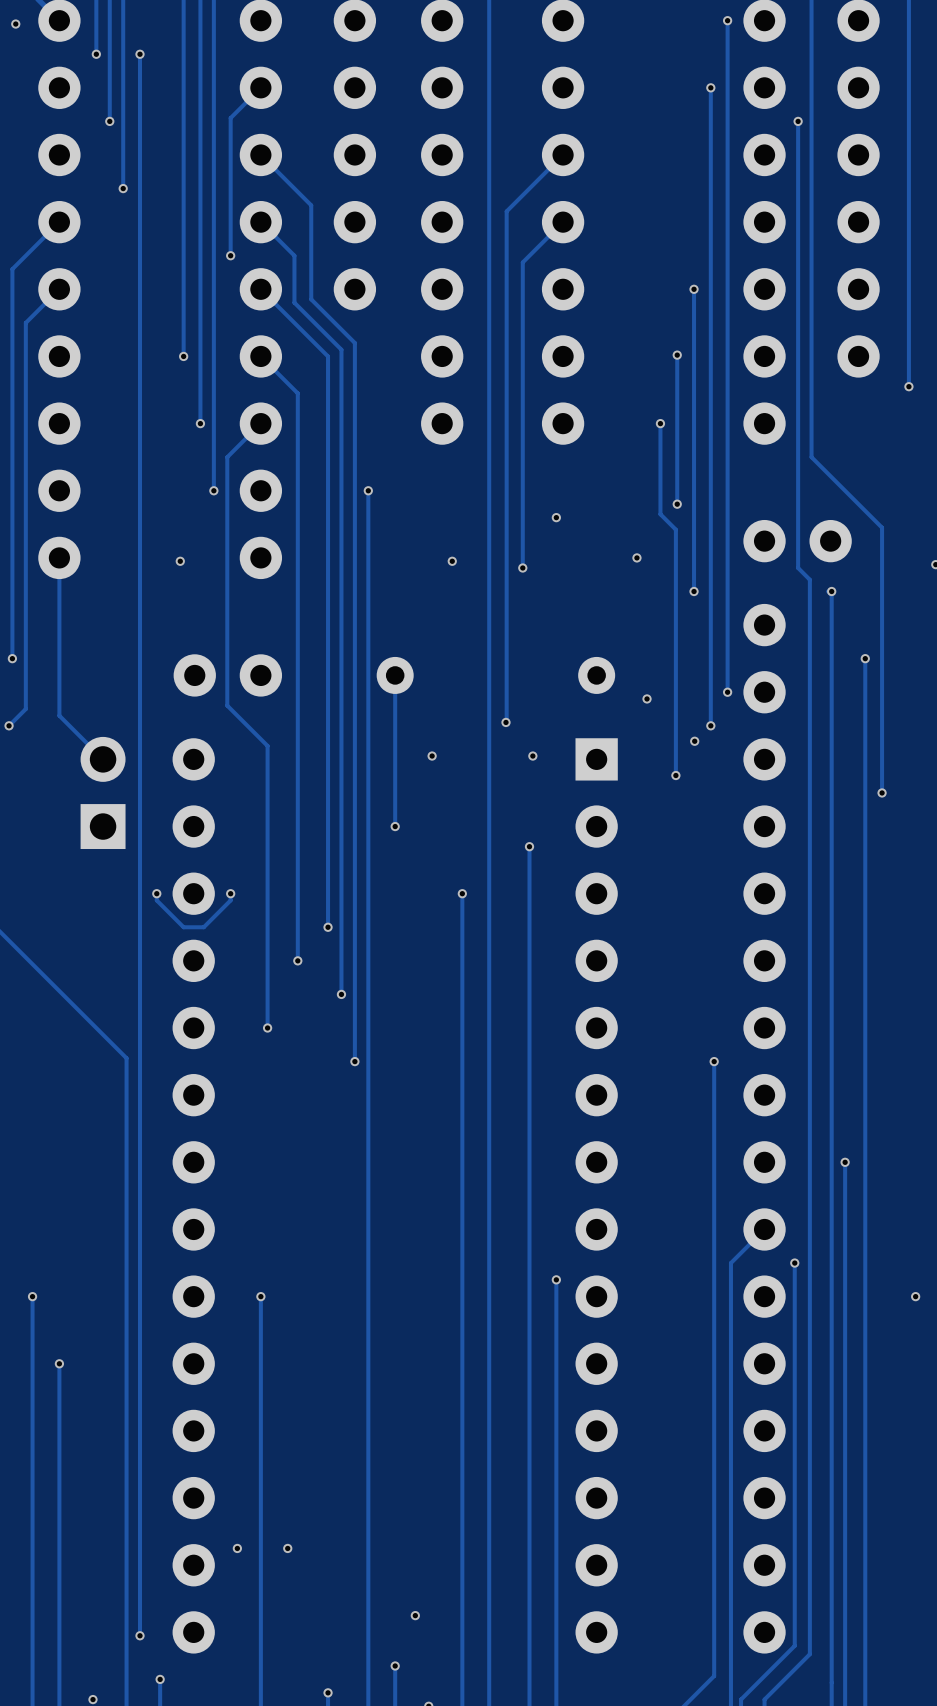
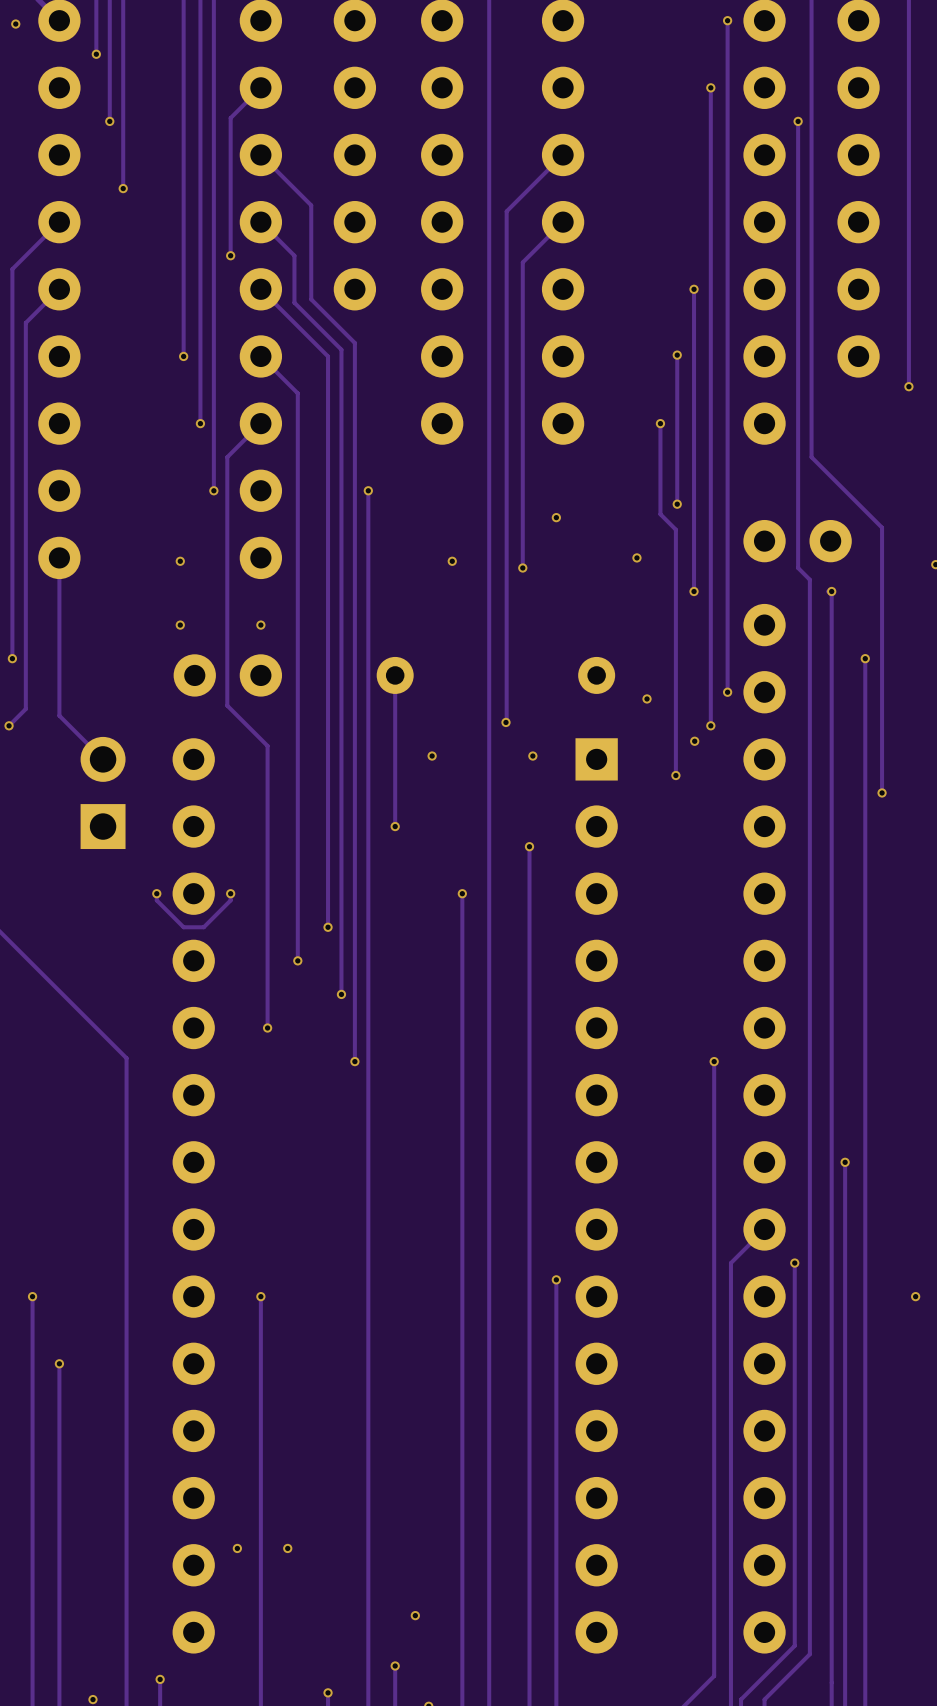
track: (139, 54) (139, 1635) -> none
via: (139, 54) -> none
via: none -> (180, 625)
via: none -> (260, 625)
via: (139, 1635) -> none

